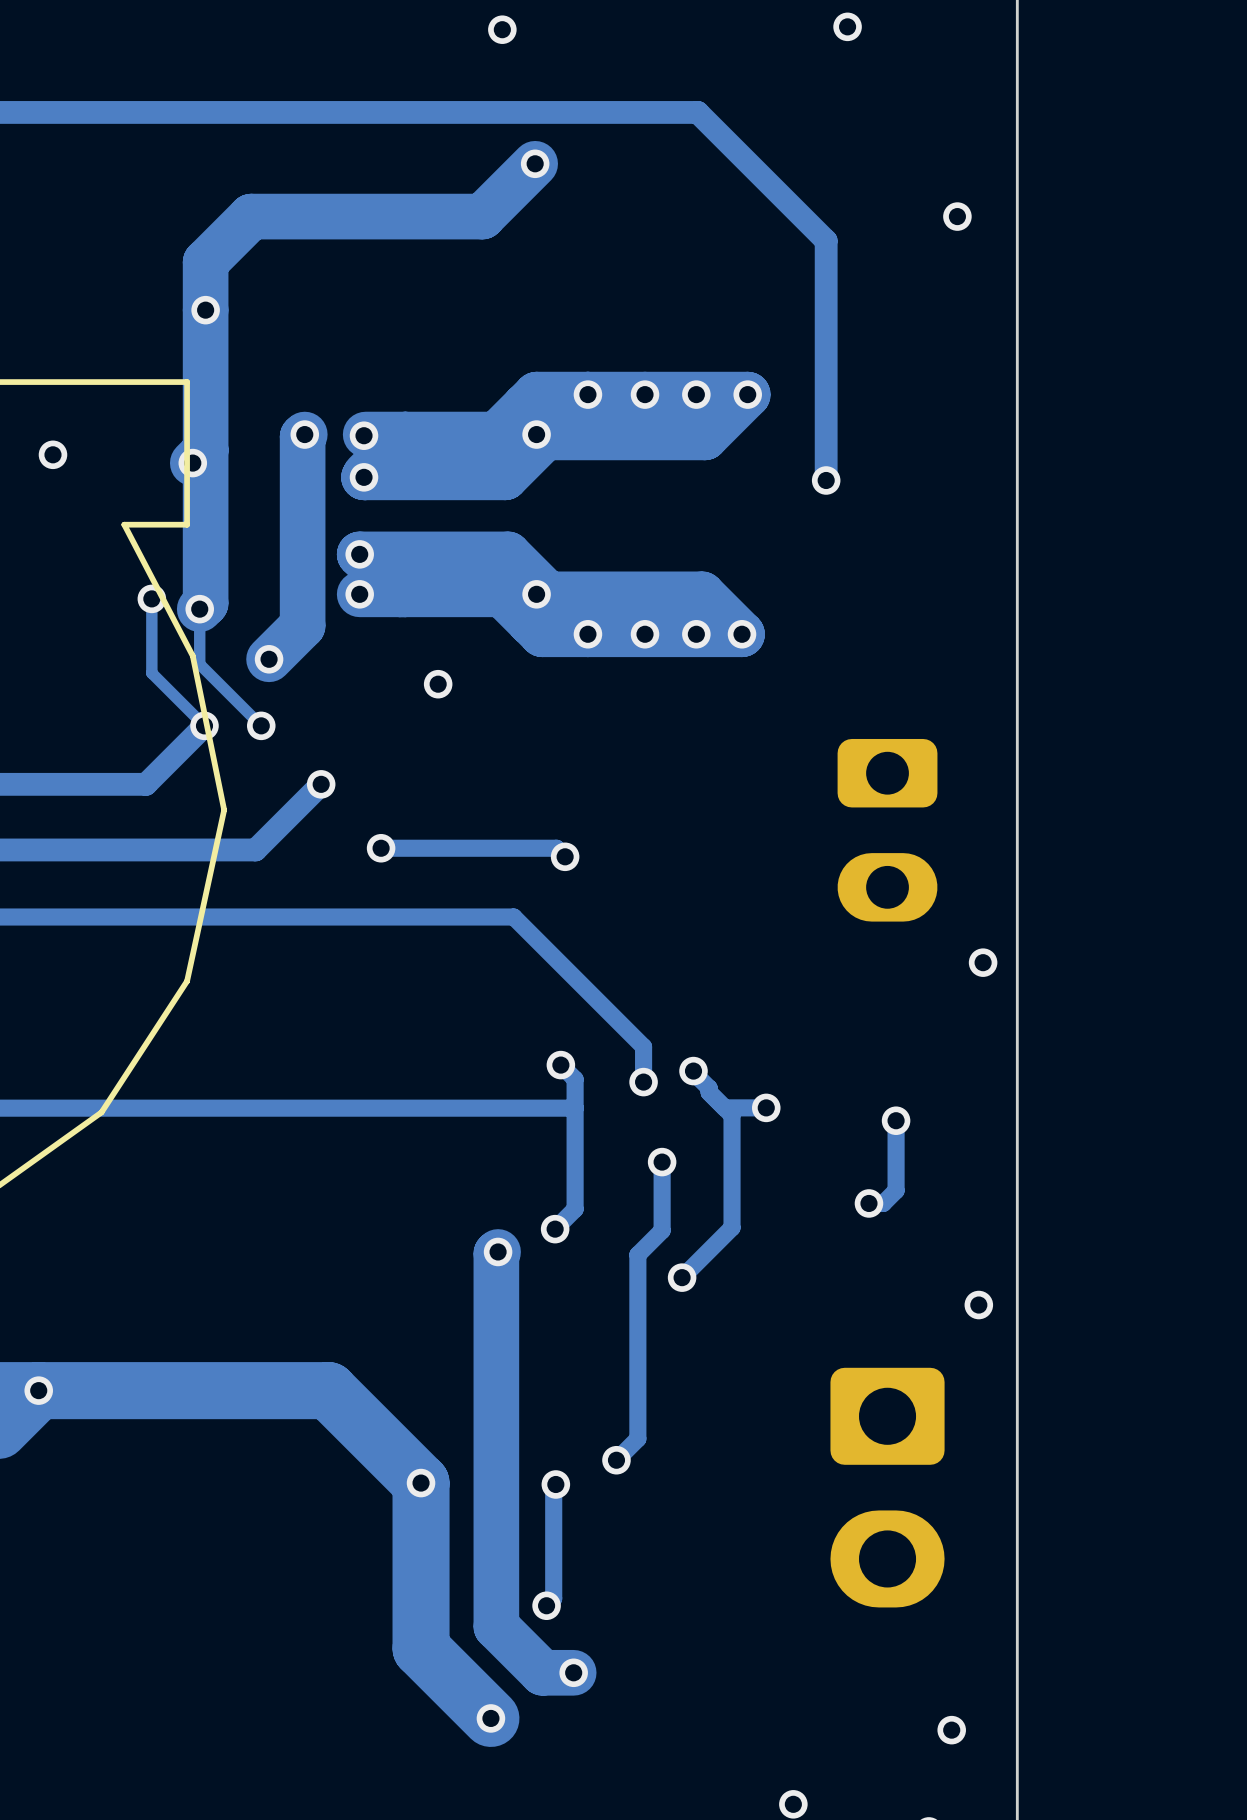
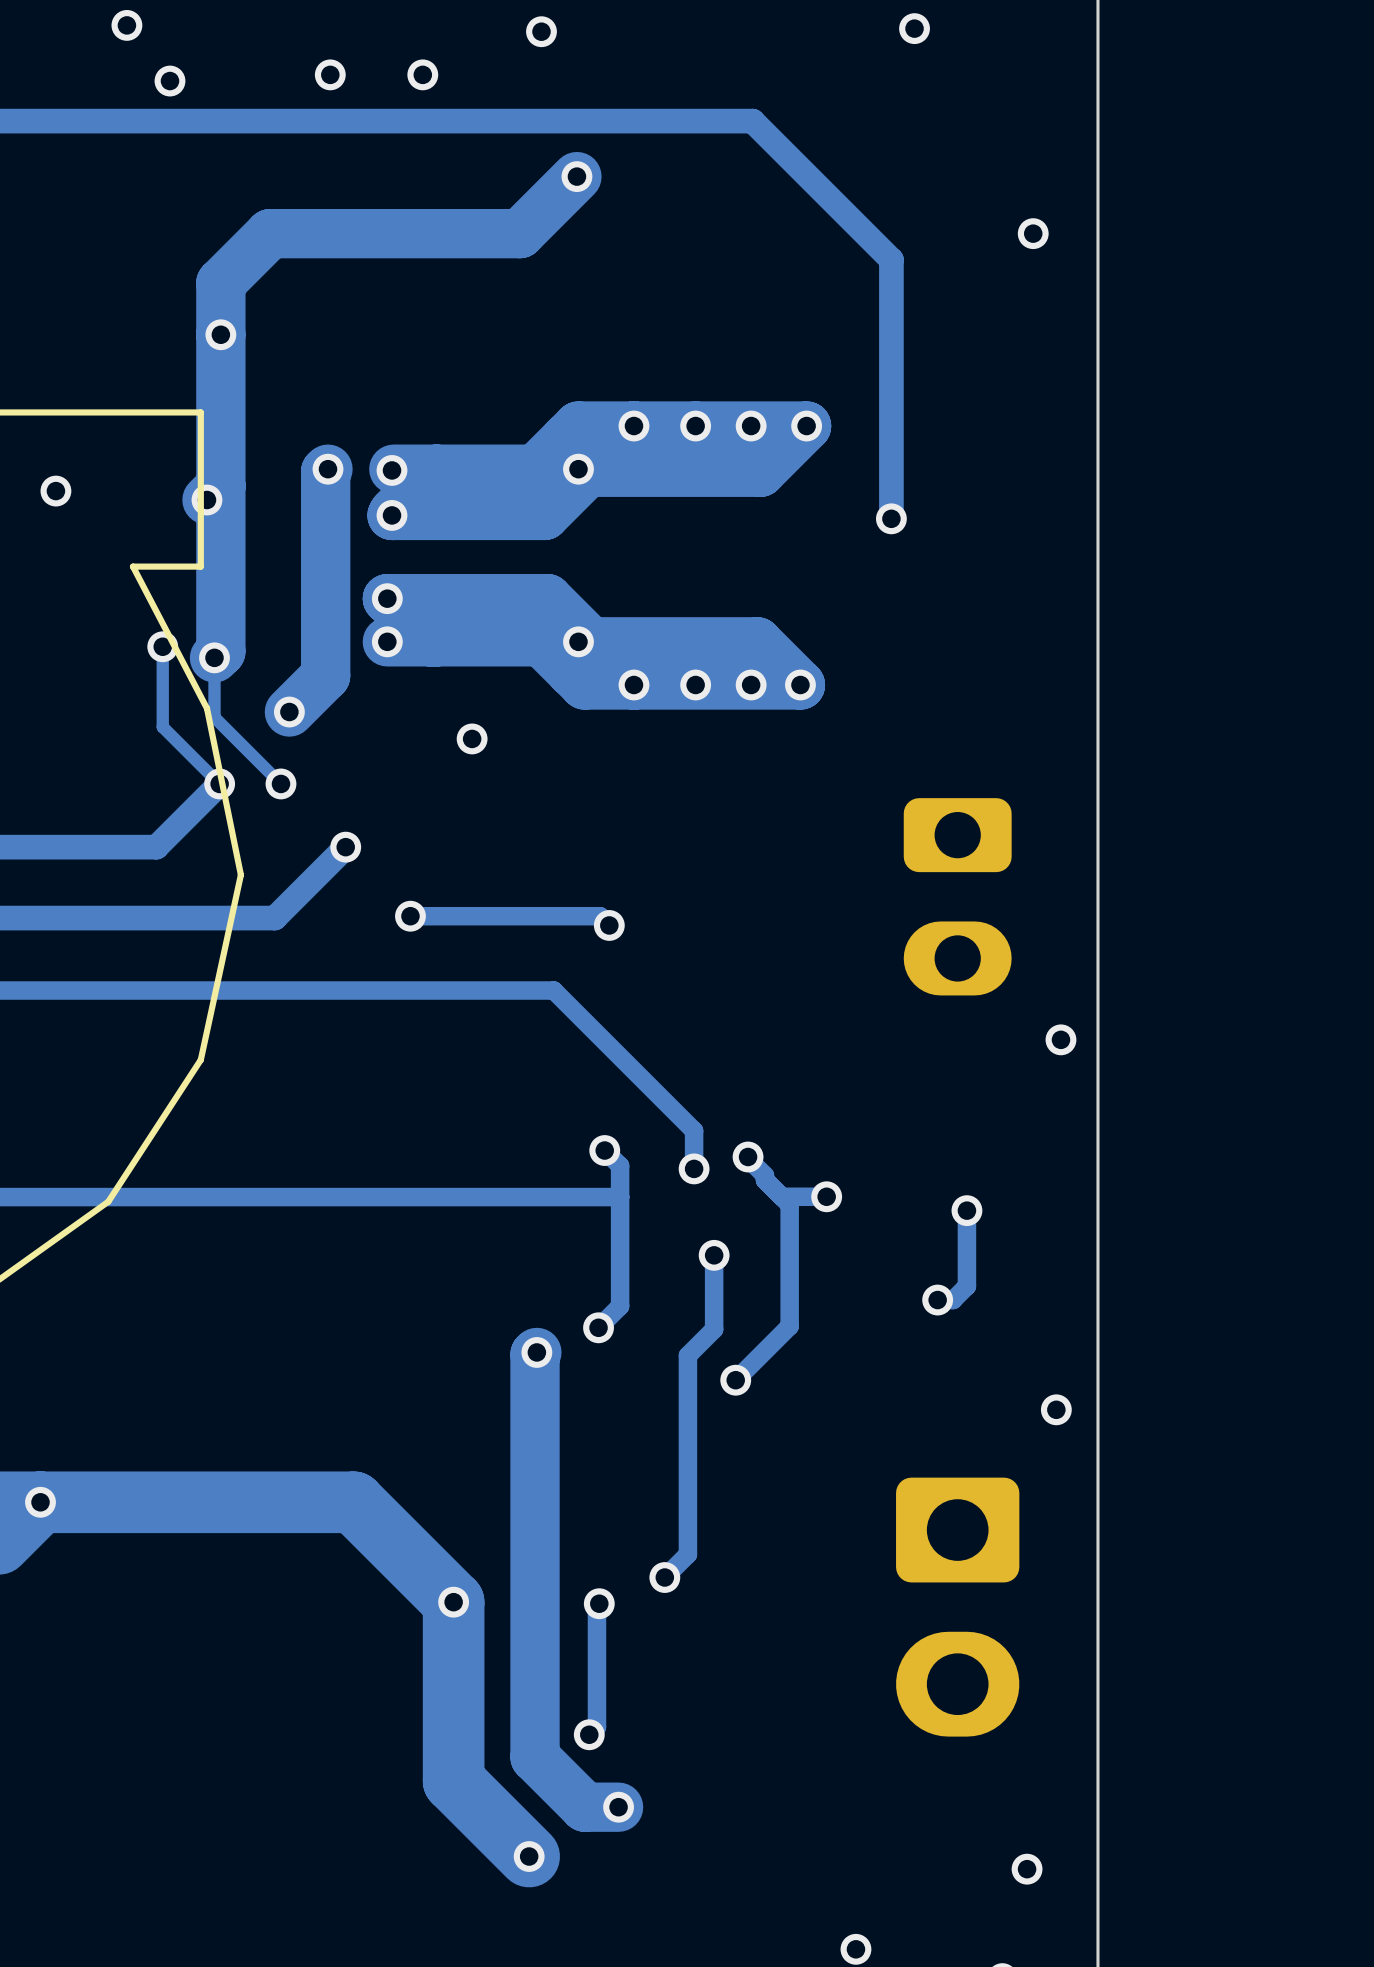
via: none -> (126, 25)
via: none -> (330, 74)
via: none -> (422, 74)
via: none -> (169, 81)

